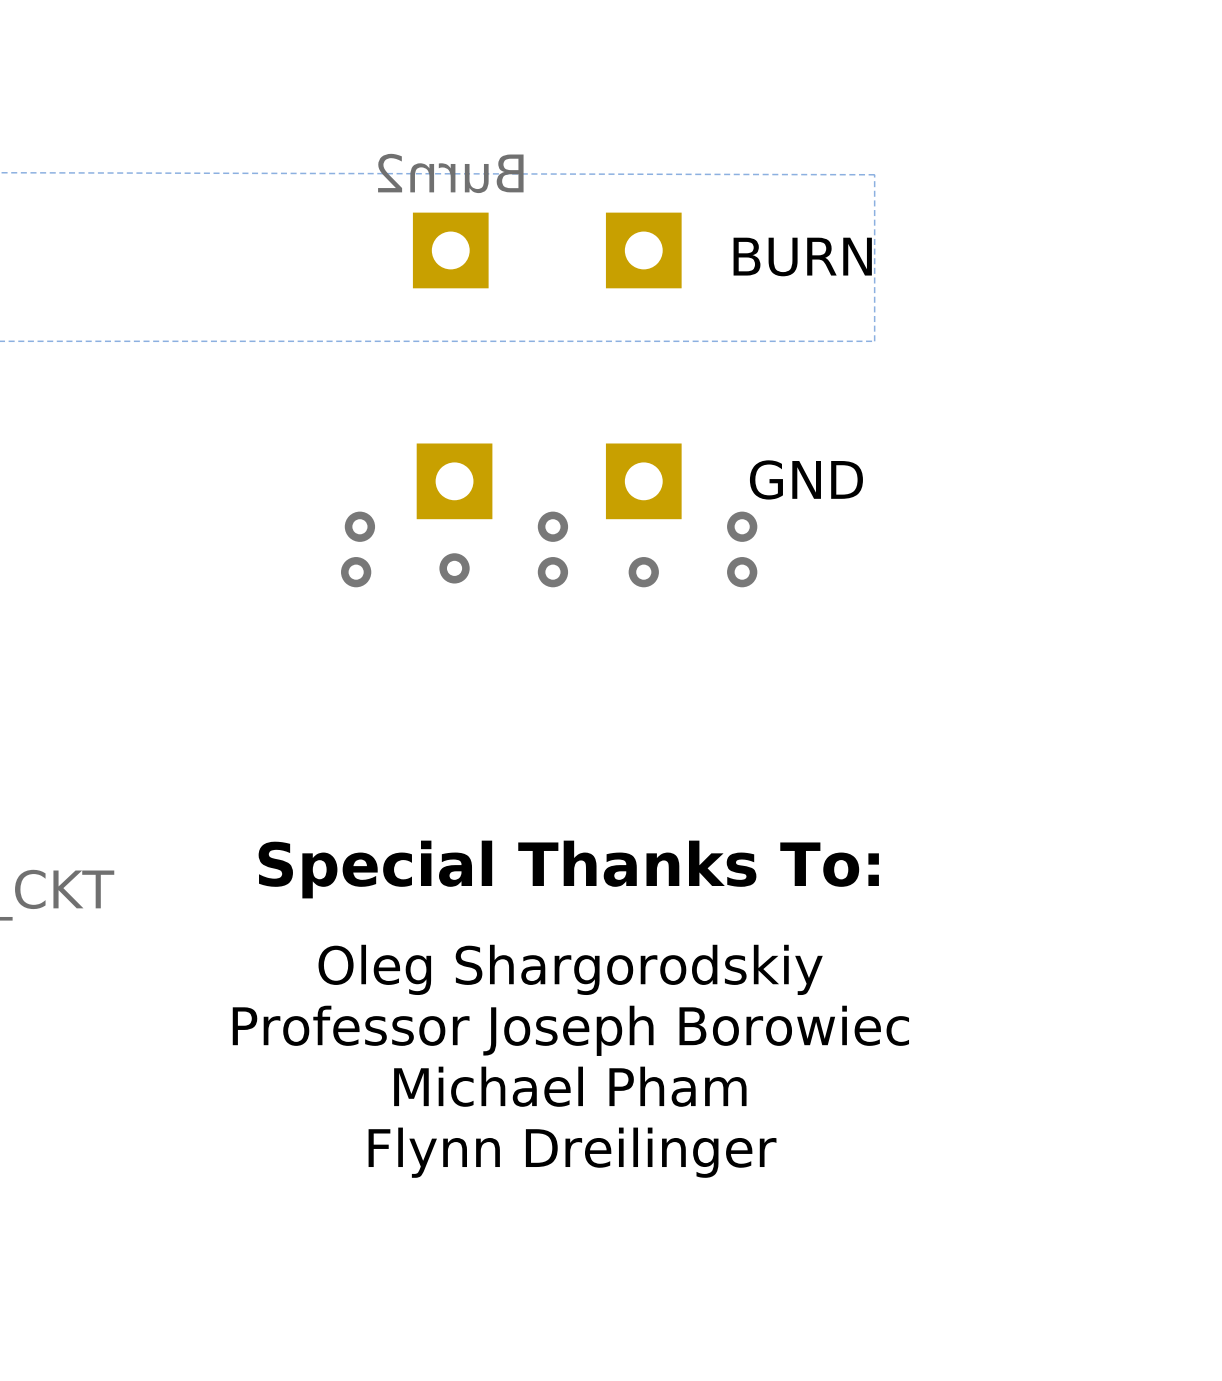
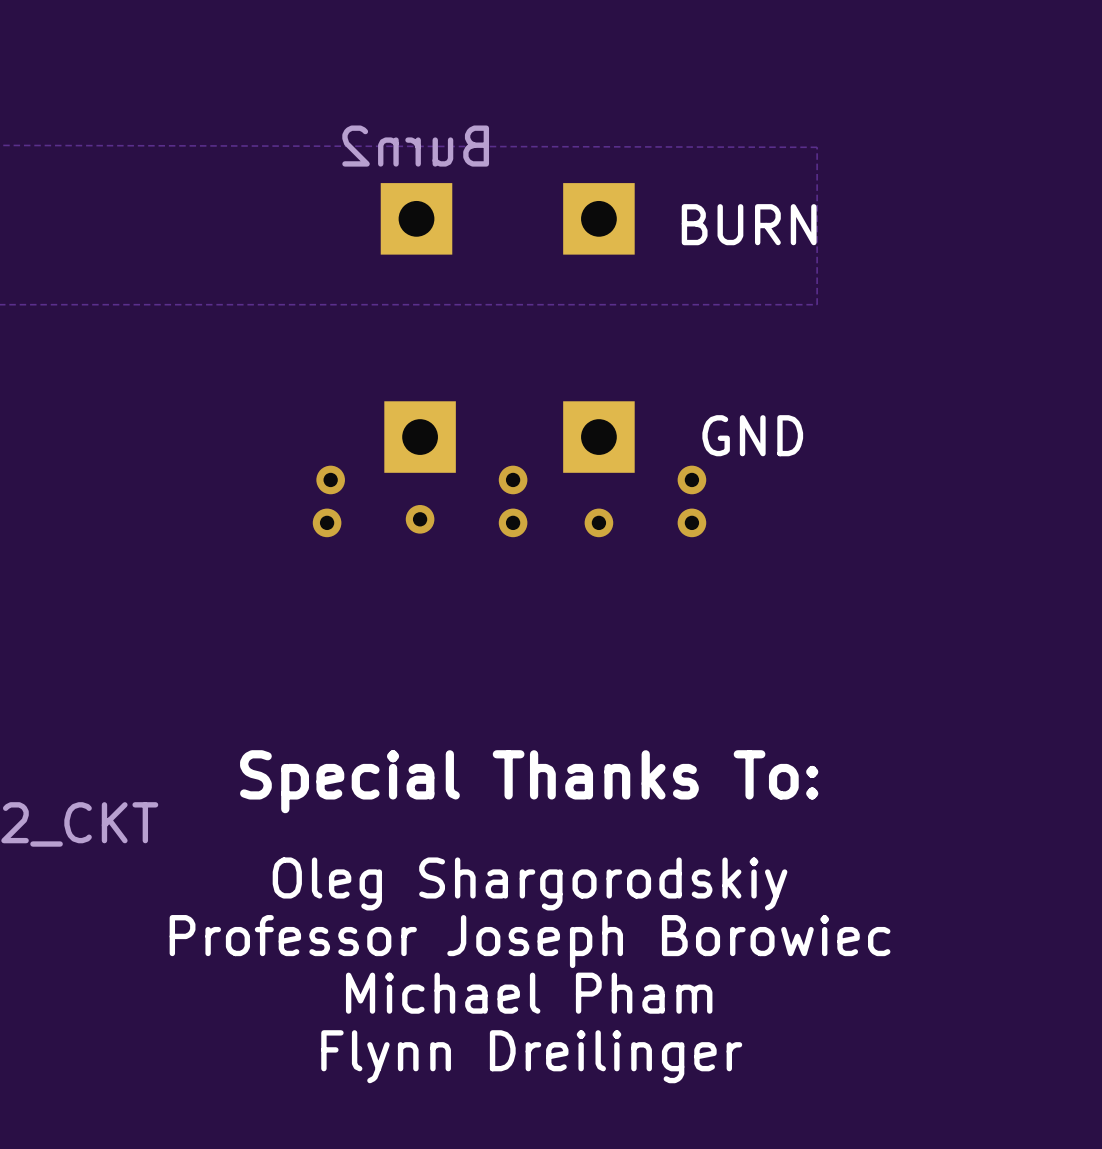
text position: Special Thanks To: (568, 869) -> Special Thanks To: (529, 781)
text position: Oleg Shargorodskiy (570, 969) -> Oleg Shargorodskiy (530, 883)
text position: Professor Joseph Borowiec (570, 1030) -> Professor Joseph Borowiec (530, 941)
text position: Michael Pham (570, 1086) -> Michael Pham (529, 993)
text position: Flynn Dreilinger (572, 1152) -> Flynn Dreilinger (531, 1056)

